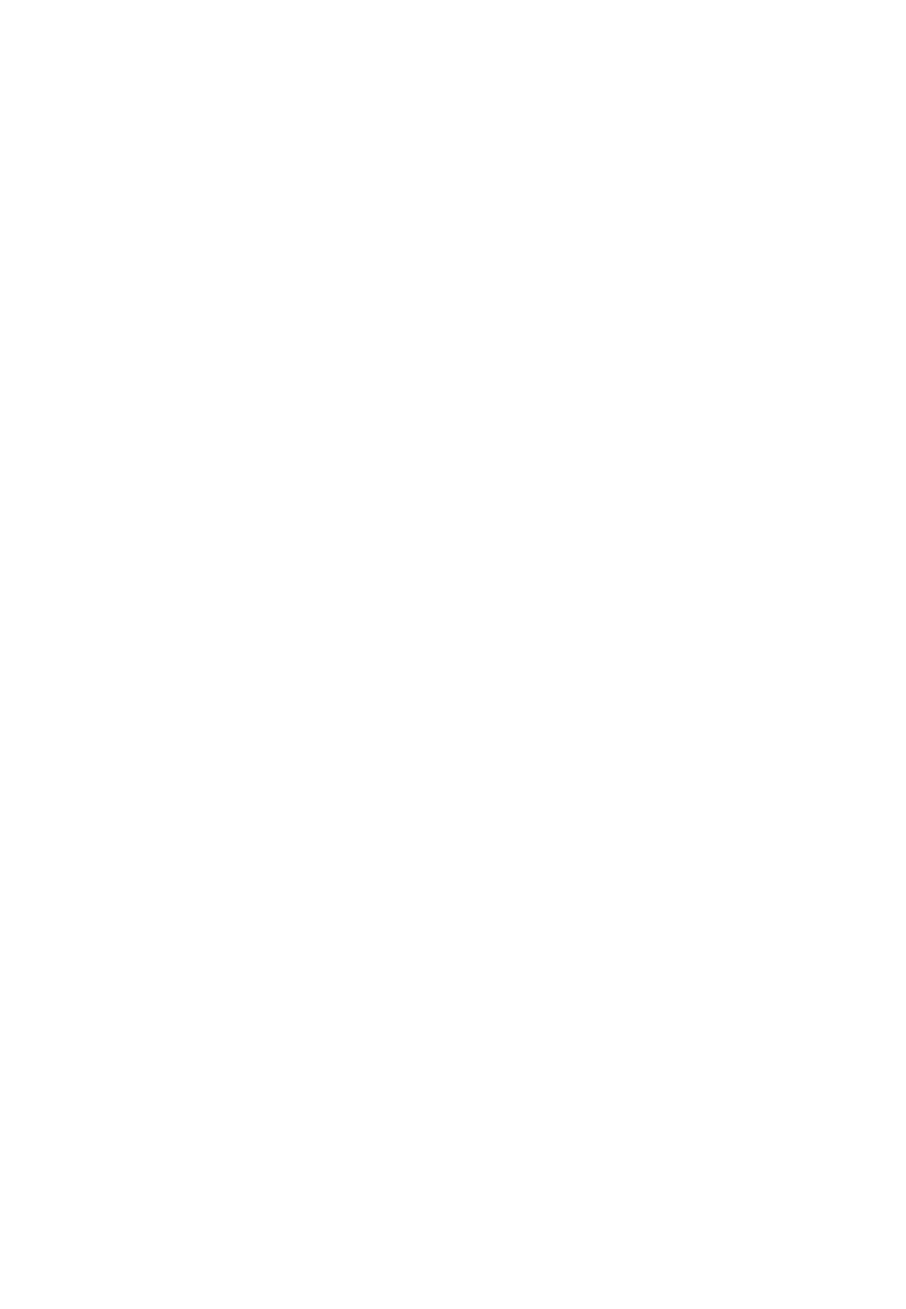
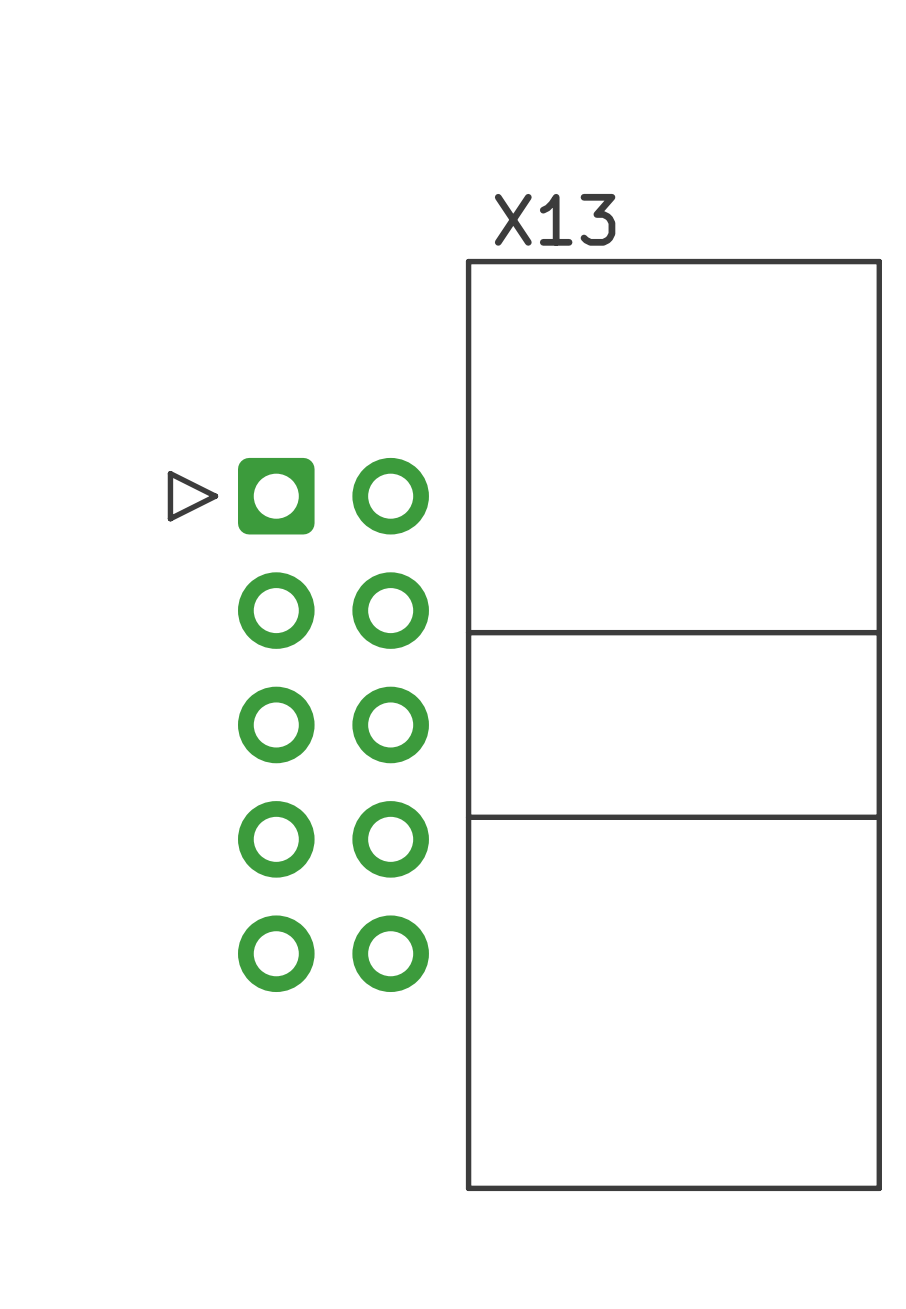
X13: none -> (524, 724)

